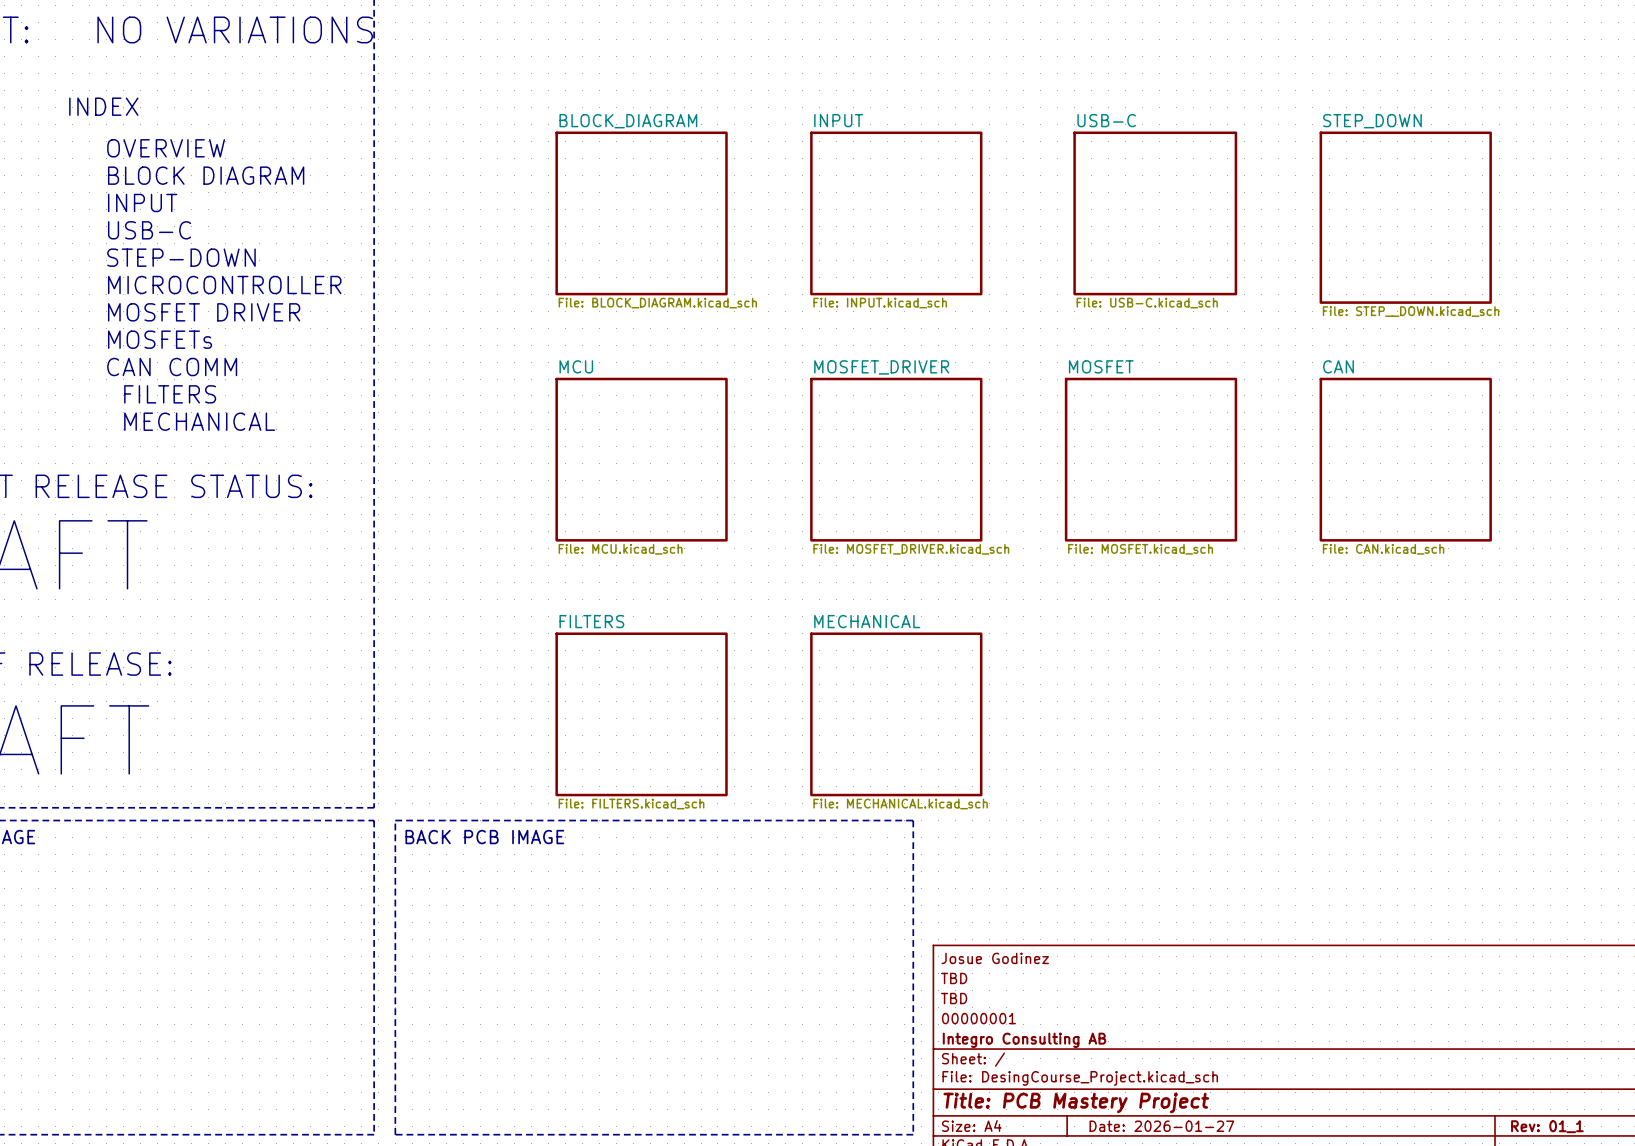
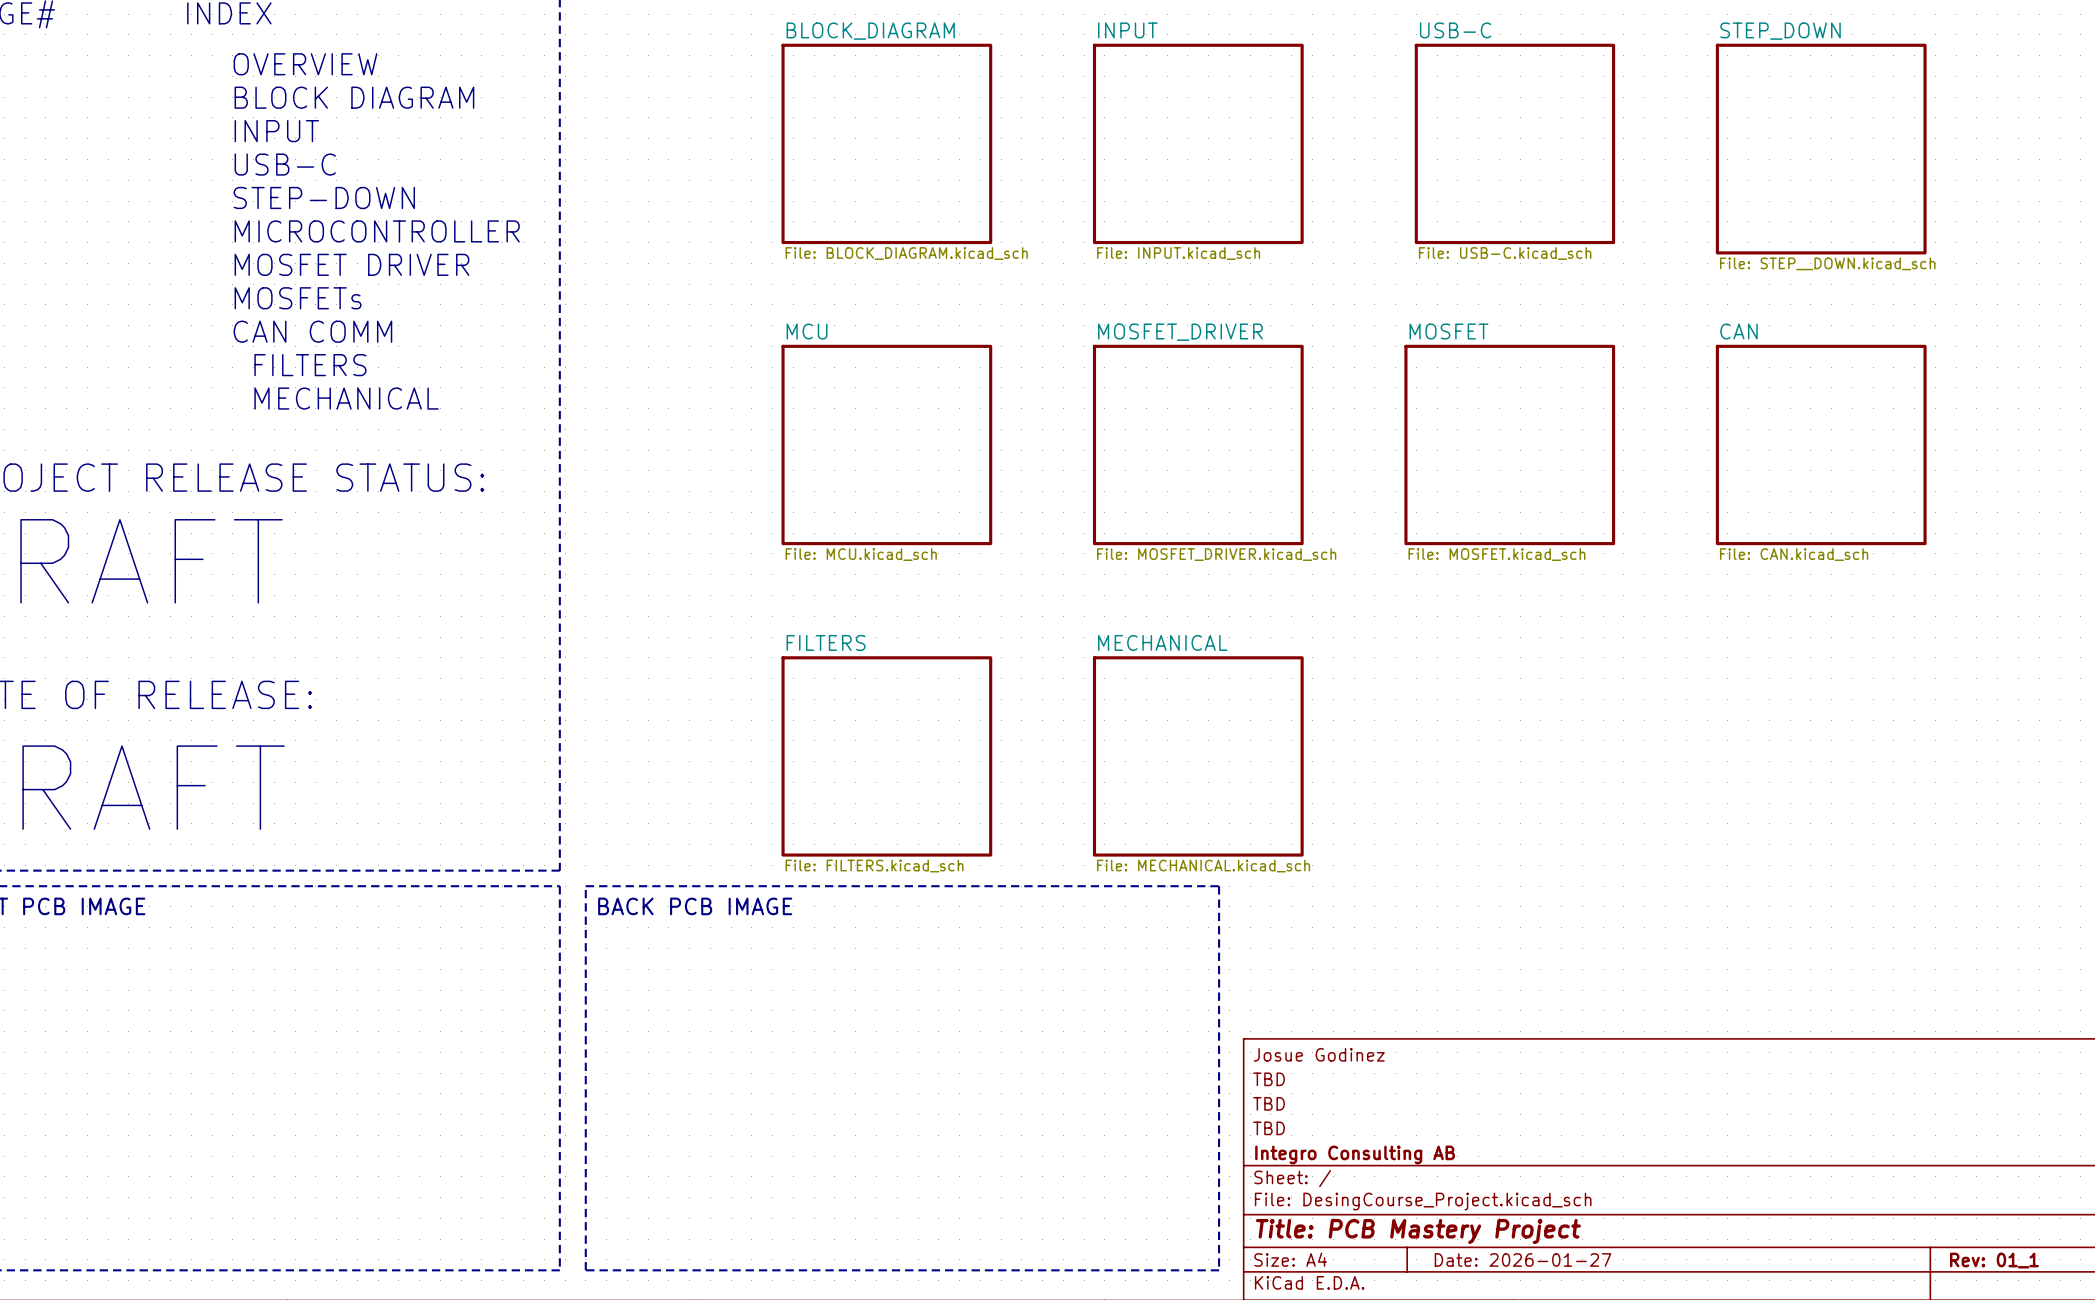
title block: 00000001 (978, 1018) -> TBD (1269, 1128)

